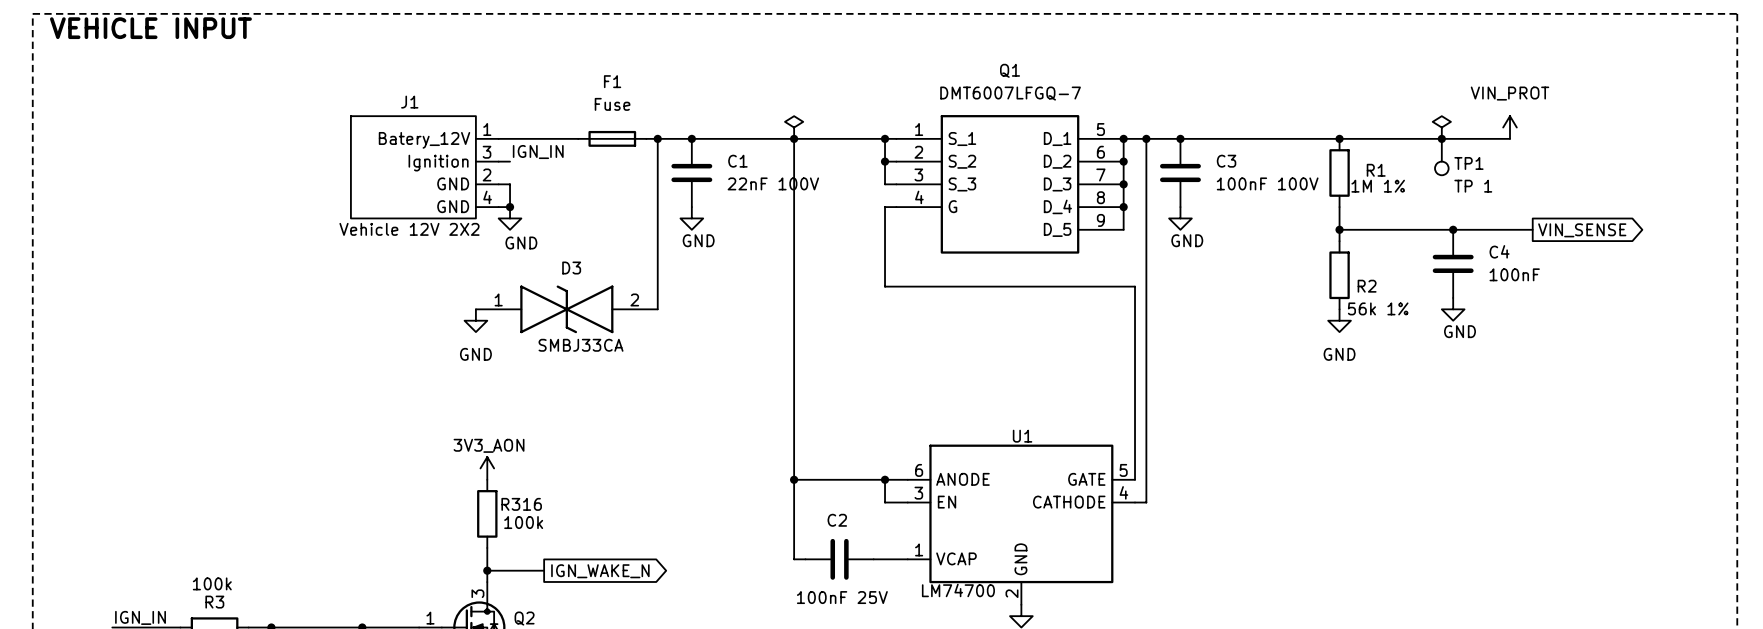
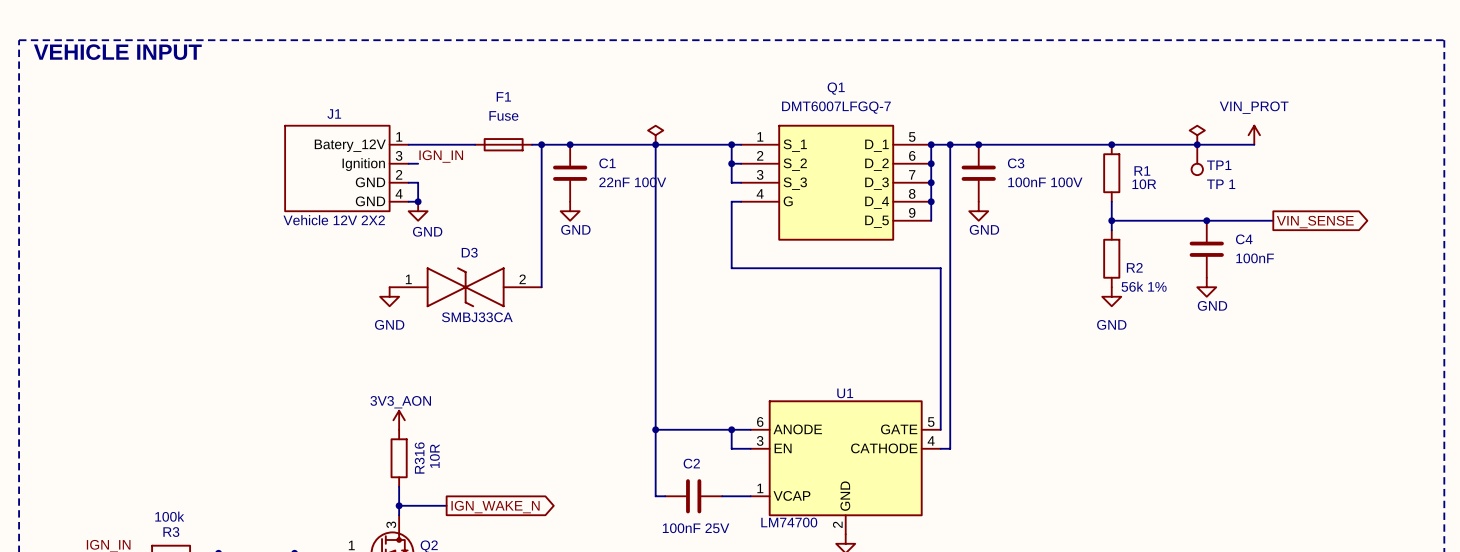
R1 value: 1M 1% (1378, 186) -> 10R (1144, 184)
R316 name rotation: 0° (521, 504) -> 90° counterclockwise (419, 458)
R316 value: 100k (523, 522) -> 10R (434, 456)

